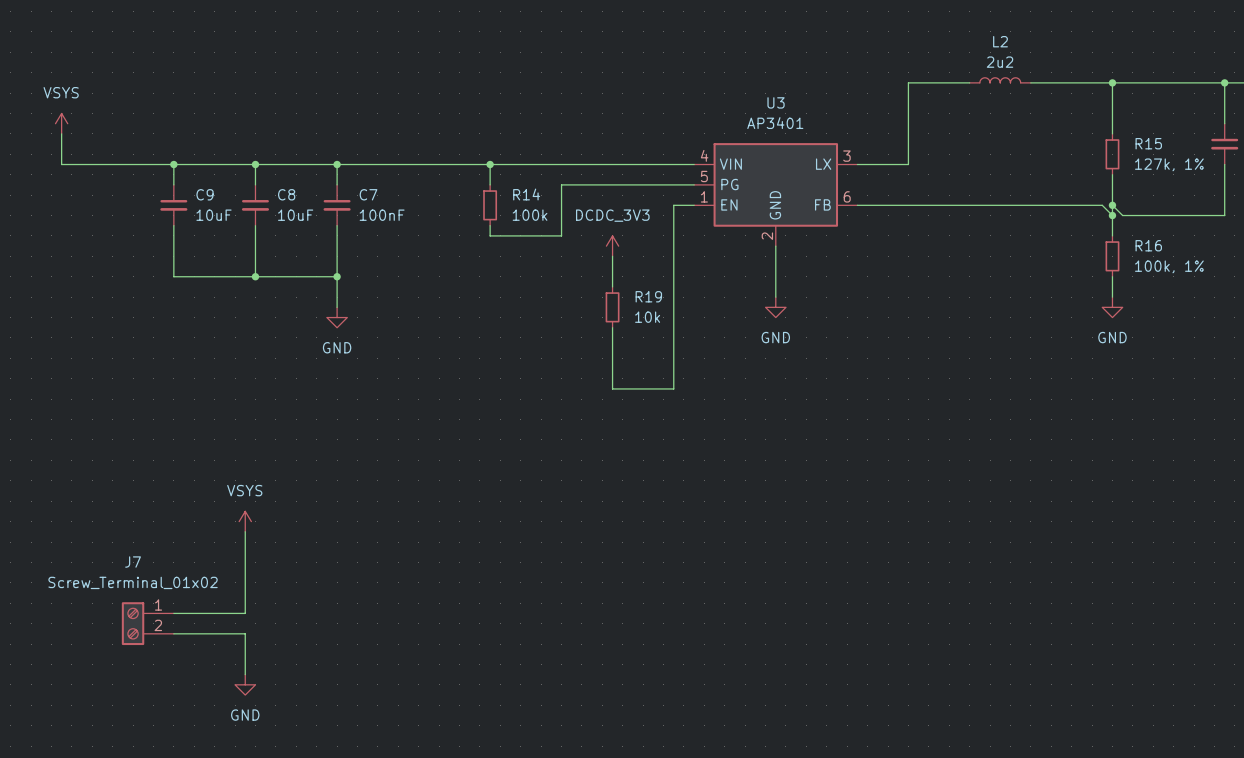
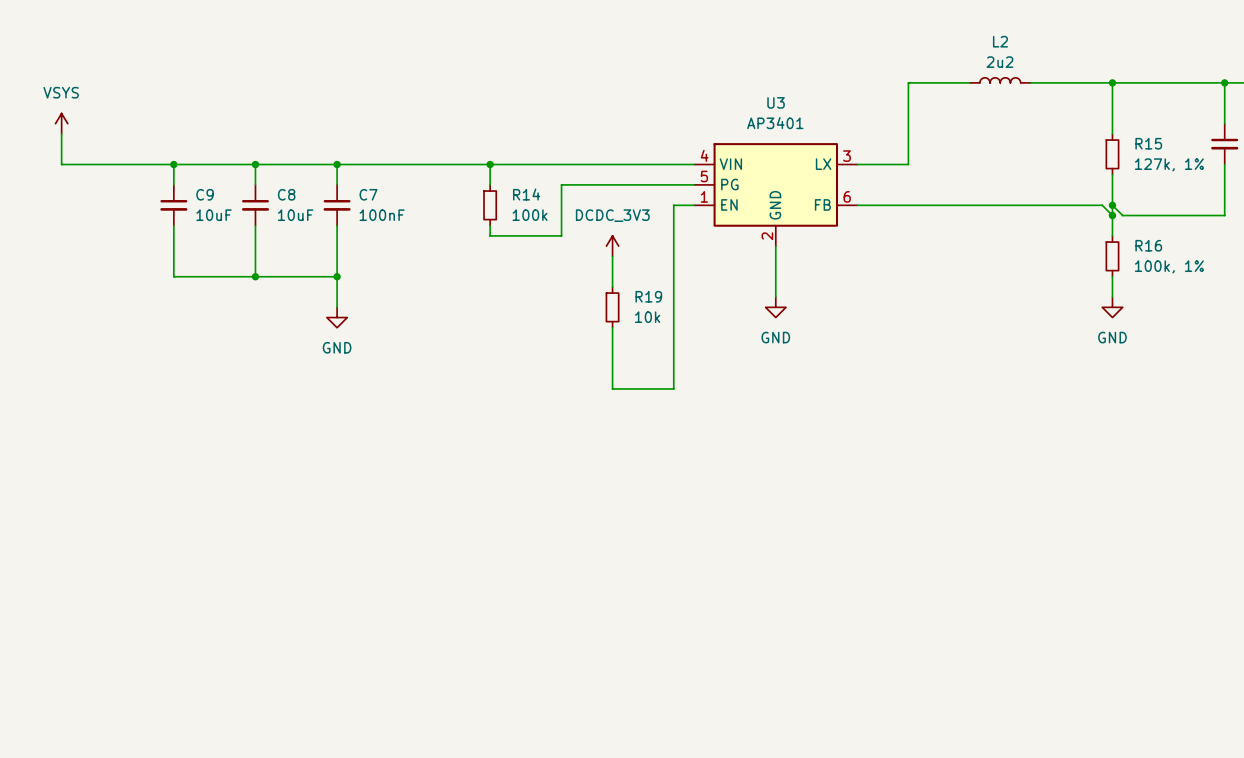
power symbol: VSYS (245, 521) -> none
wire: (245, 531) (245, 613) (173, 613) -> none
J7: Screw_Terminal_01x02 (147, 623) -> none
wire: (173, 633) (245, 633) (245, 674) -> none
power symbol: GND (245, 684) -> none

